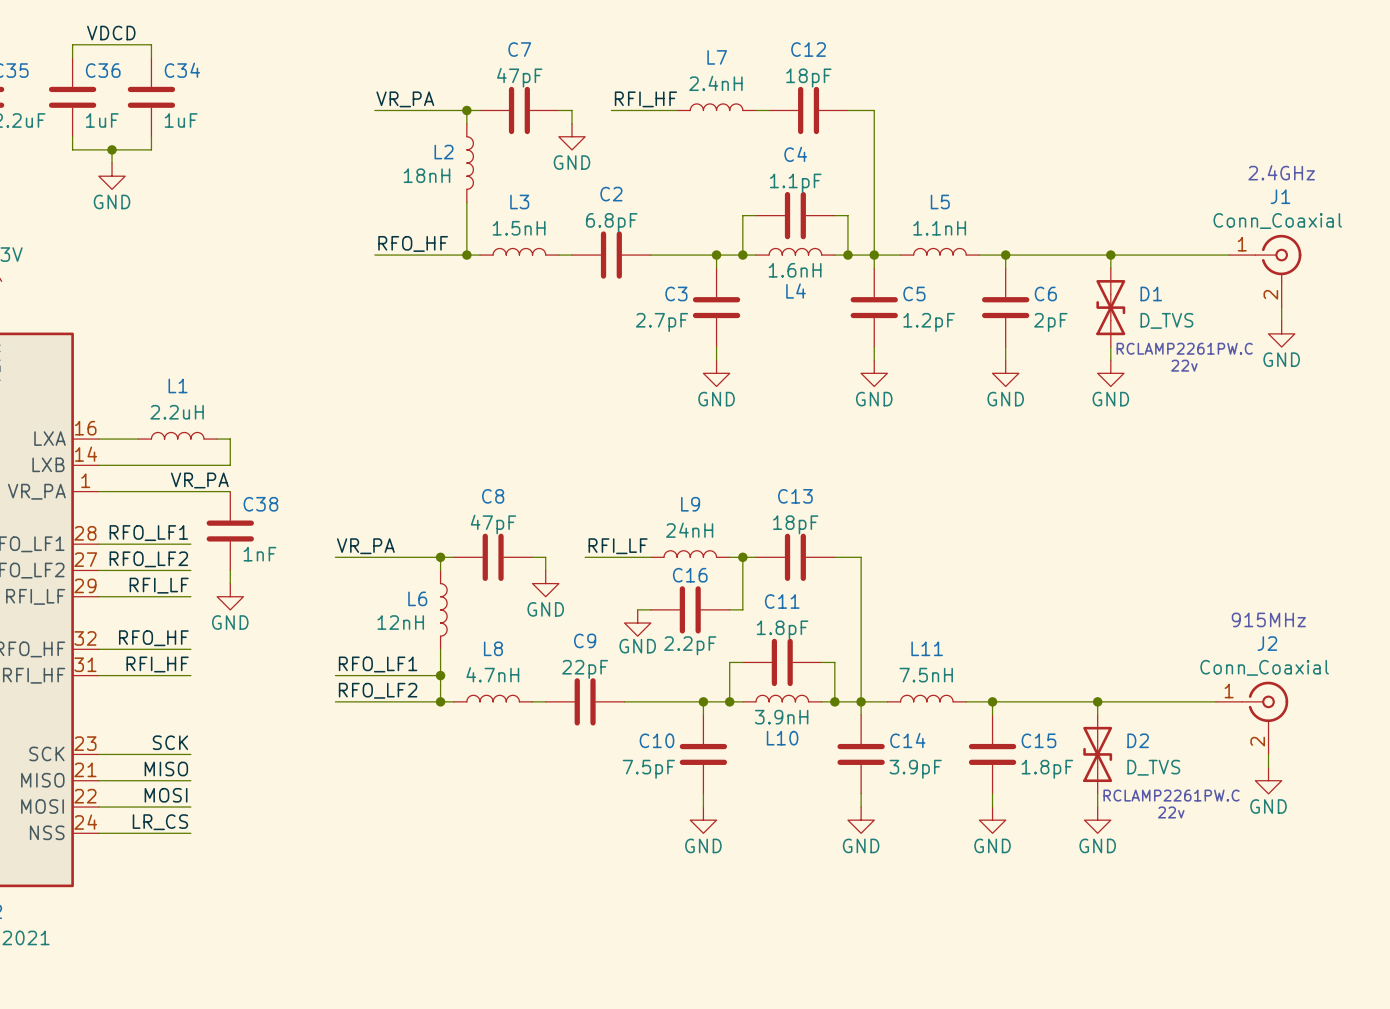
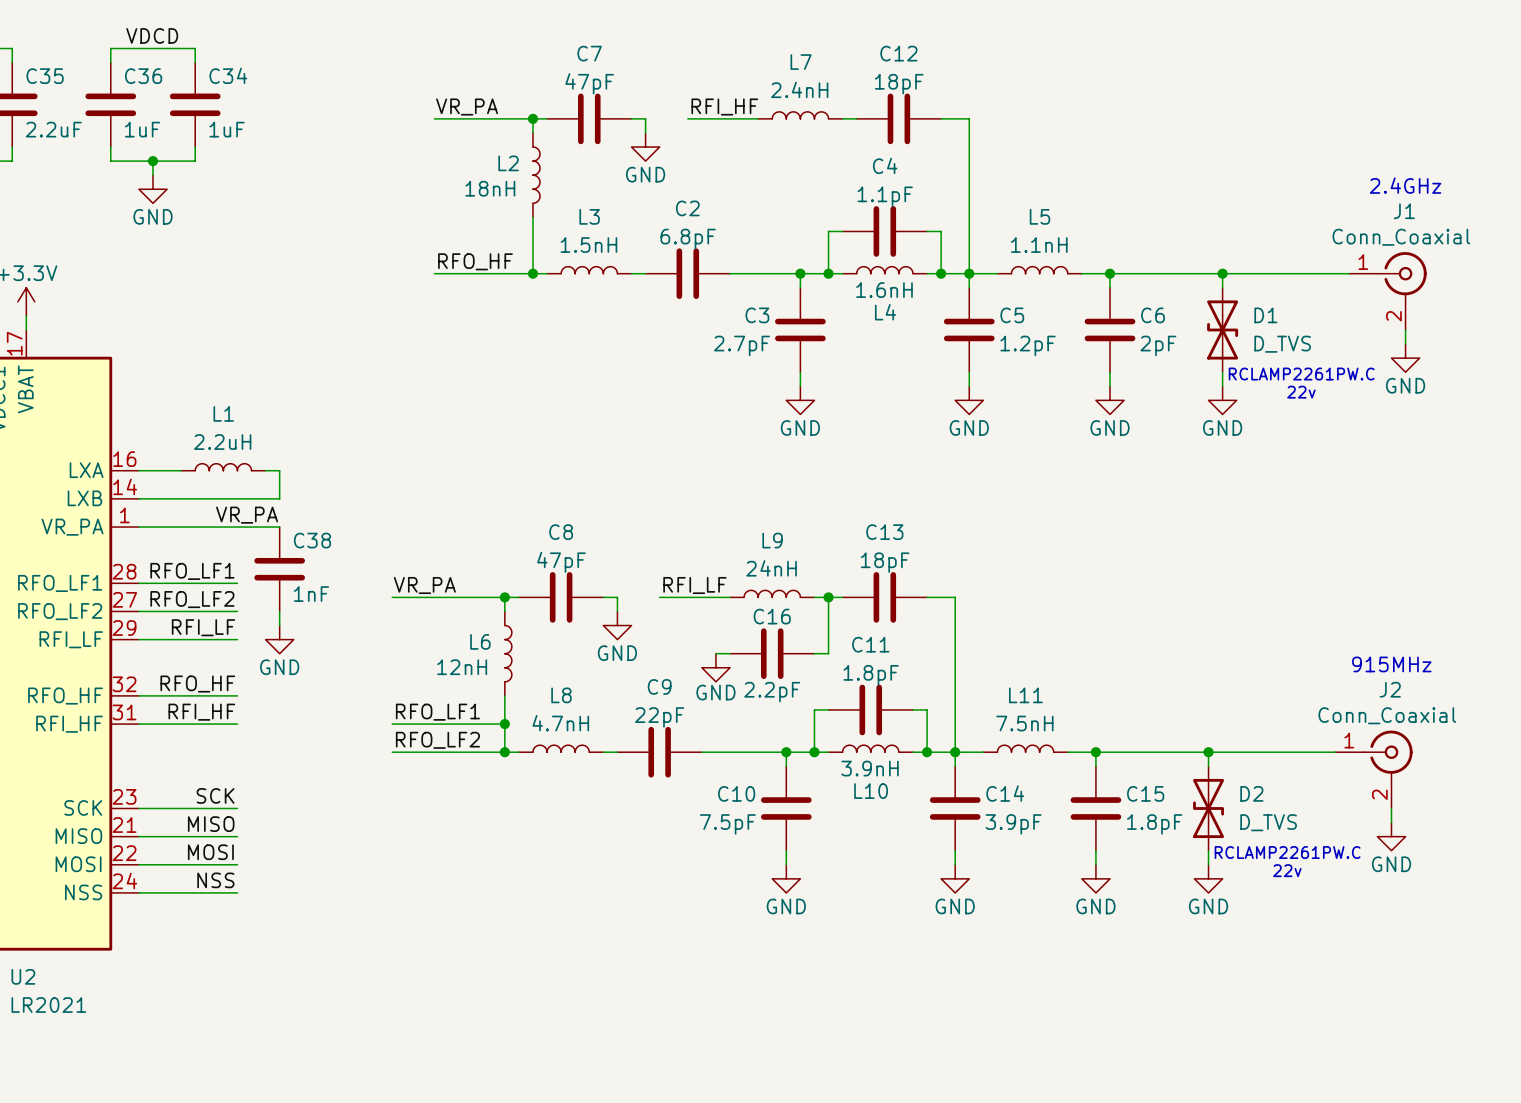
label: LR_CS (160, 822) -> NSS (215, 880)

